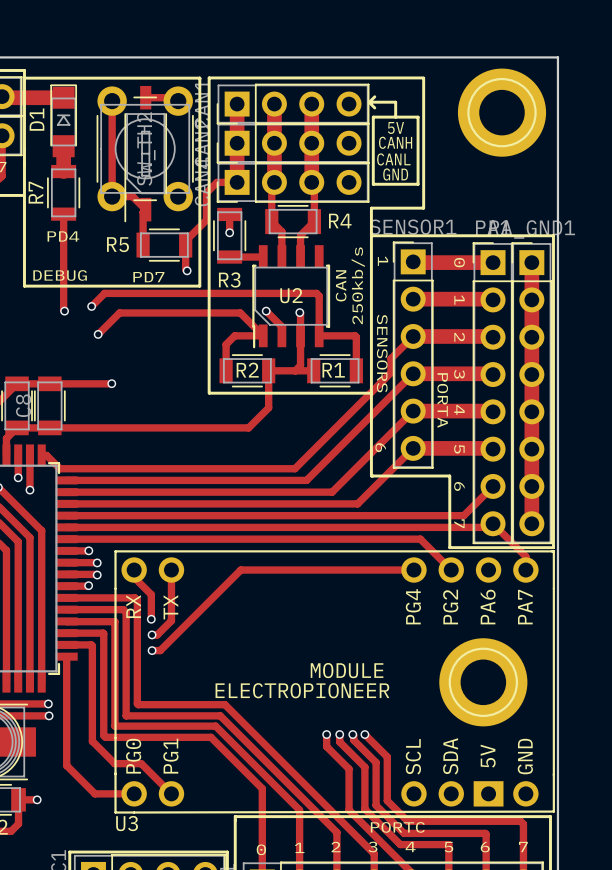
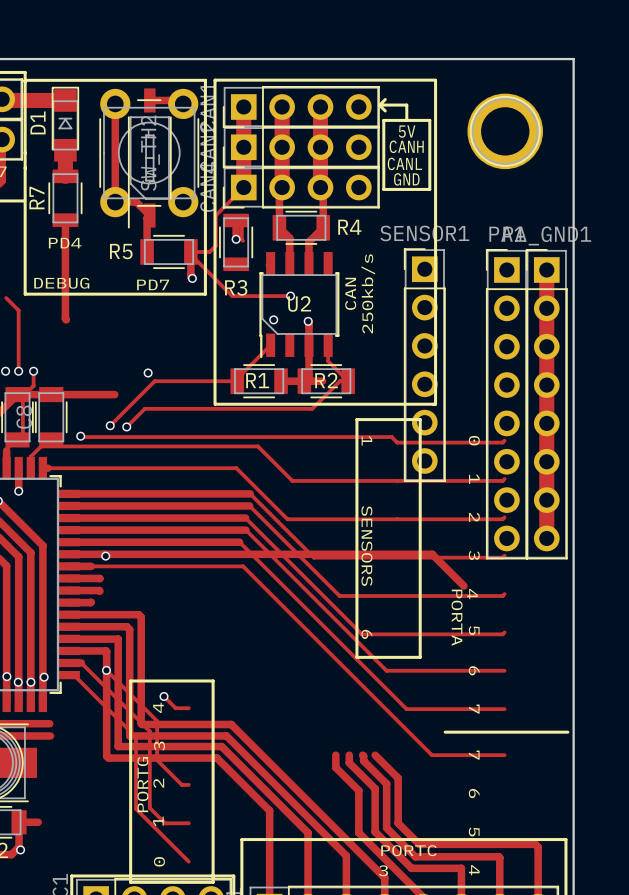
part: (502, 112) -> none
part: none -> (505, 131)
track: (237, 182) (216, 182) (206, 192) (206, 220) (185, 240) (185, 245) -> (243, 187) (215, 215) (215, 245) (209, 251) (190, 251)
line: (423, 208) (371, 208) (371, 476) (449, 476) (449, 547) (553, 547) (553, 235) (371, 235) -> (435, 213) (435, 404) (381, 404)
track: none -> (241, 221) (243, 240)
track: none -> (190, 254) (232, 296) (290, 296)
track: (229, 257) (262, 257) -> none
text: 1 (383, 261) -> none
track: (413, 261) (493, 262) -> none
text position: 0 (459, 262) -> 0 (474, 440)
via: none -> (290, 296)
track: none -> (6, 297) (18, 310) (18, 371)
track: (413, 299) (493, 299) -> none
text: 1 (459, 299) -> none
track: (91, 306) (104, 293) (316, 293) (319, 296) (319, 335) (355, 335) (356, 370) -> none
via: (91, 306) -> none
via: (64, 311) -> none
track: (266, 311) (281, 326) (281, 335) -> none
track: (98, 334) (119, 312) (240, 312) (263, 335) (234, 335) (226, 344) (226, 370) -> none
via: (98, 334) -> none
track: none -> (270, 345) (237, 378) (237, 381) (154, 381) (110, 425)
track: none -> (328, 345) (328, 361) (348, 381) (339, 381) (312, 408) (144, 408) (126, 426)
text position: 2 (459, 337) -> 2 (474, 517)
track: (493, 337) (413, 336) (391, 358) (391, 372) (294, 468) (59, 468) (46, 455) -> (504, 517) (502, 519) (287, 519) (236, 468) (47, 468)
text position: SENSORS (382, 353) -> SENSORS (366, 546)
via: none -> (5, 371)
via: none -> (18, 371)
via: none -> (33, 371)
via: none -> (148, 373)
R2 position: (247, 370) -> (326, 381)
track: (273, 370) (268, 370) (268, 407) (248, 427) (17, 427) (6, 438) -> (33, 371) (33, 385) (22, 396) (22, 432) (6, 450)
R1 position: (335, 370) -> (259, 381)
text position: 3 (459, 374) -> 3 (474, 555)
track: (493, 374) (413, 373) (306, 480) (243, 480) -> (504, 555) (502, 557) (313, 557) (250, 493)
via: (111, 383) -> none
text position: PORTA (442, 400) -> PORTA (457, 617)
line: none -> (356, 419) (420, 419) (420, 657) (356, 657) (356, 419)
text: 4 (459, 409) -> none
track: (493, 411) (413, 411) (332, 492) (242, 492) -> (504, 594) (502, 596) (339, 596) (249, 505)
via: none -> (110, 425)
via: none -> (126, 426)
track: none -> (80, 436) (391, 437) (397, 442) (502, 442) (504, 440)
via: none -> (80, 436)
text: none -> 1 (366, 440)
text: 6 (380, 447) -> none
text: 5 (459, 449) -> none
track: (493, 449) (413, 448) (357, 503) (238, 503) -> (504, 632) (502, 634) (361, 634) (245, 518)
track: (29, 455) (29, 490) -> (30, 468) (30, 456) (41, 446) (257, 446) (292, 480) (502, 480) (504, 479)
text: none -> 1 (474, 479)
text: 6 (459, 486) -> none
track: (493, 486) (463, 515) (239, 515) -> (504, 670) (386, 670) (246, 530)
via: (29, 490) -> none
text: 7 (459, 523) -> none
track: (233, 527) (489, 527) (493, 523) (525, 556) (525, 570) -> (239, 542) (406, 709) (504, 709)
via: none -> (105, 556)
track: none -> (91, 566) (243, 566) (431, 755) (504, 755)
via: (88, 550) -> none
via: (97, 562) -> none
track: (134, 570) (134, 577) (151, 594) (151, 619) -> none
track: (171, 570) (171, 620) (157, 634) (152, 634) -> none
track: (413, 570) (240, 570) (160, 650) (152, 650) -> none
via: (97, 575) -> none
text: none -> 4 (472, 594)
via: (88, 585) -> none
text: none -> 5 (474, 630)
text: none -> 6 (366, 634)
via: (151, 619) -> none
via: (152, 634) -> none
track: (79, 644) (92, 645) (92, 741) (114, 763) (141, 763) (171, 793) -> (81, 663) (149, 731) (149, 807) (165, 823) (188, 823)
via: (152, 650) -> none
track: none -> (106, 670) (157, 721) (157, 760) (181, 784) (188, 784)
via: none -> (106, 670)
text: none -> 6 (474, 670)
track: (66, 656) (66, 765) (94, 793) (134, 793) -> (68, 675) (73, 675) (136, 737) (136, 808) (188, 861)
via: none -> (6, 676)
via: none -> (44, 677)
line: none -> (130, 680) (213, 680) (213, 882) (130, 882) (130, 680)
via: none -> (18, 682)
via: none -> (30, 682)
track: none -> (164, 696) (175, 708) (188, 708)
via: none -> (164, 696)
U3: (334, 681) -> none
part: (483, 682) -> none
text: none -> 4 (158, 707)
text: none -> 7 (474, 709)
via: (48, 703) -> none
line: none -> (445, 732) (567, 732)
via: (49, 715) -> none
text: none -> 3 (159, 746)
via: (326, 734) -> none
via: (339, 734) -> none
via: (352, 734) -> none
via: (364, 734) -> none
text: none -> 7 (474, 755)
text: none -> 2 (158, 783)
text: none -> PORTG (142, 784)
via position: (37, 799) -> (20, 849)
text: none -> 1 (158, 821)
text: 1 (299, 847) -> none
text: 2 (336, 847) -> none
text rotation: 0° (410, 847) -> 90° clockwise (474, 870)
text position: 4 (410, 847) -> 4 (474, 870)
text rotation: 0° (448, 847) -> 90° clockwise (474, 831)
text position: 5 (448, 847) -> 5 (474, 831)
text rotation: 0° (485, 847) -> 90° clockwise (474, 793)
text position: 6 (485, 847) -> 6 (474, 793)
text: 7 (523, 847) -> none
text rotation: 0° (261, 849) -> 90° counterclockwise (159, 861)
text position: 0 (261, 849) -> 0 (159, 861)

